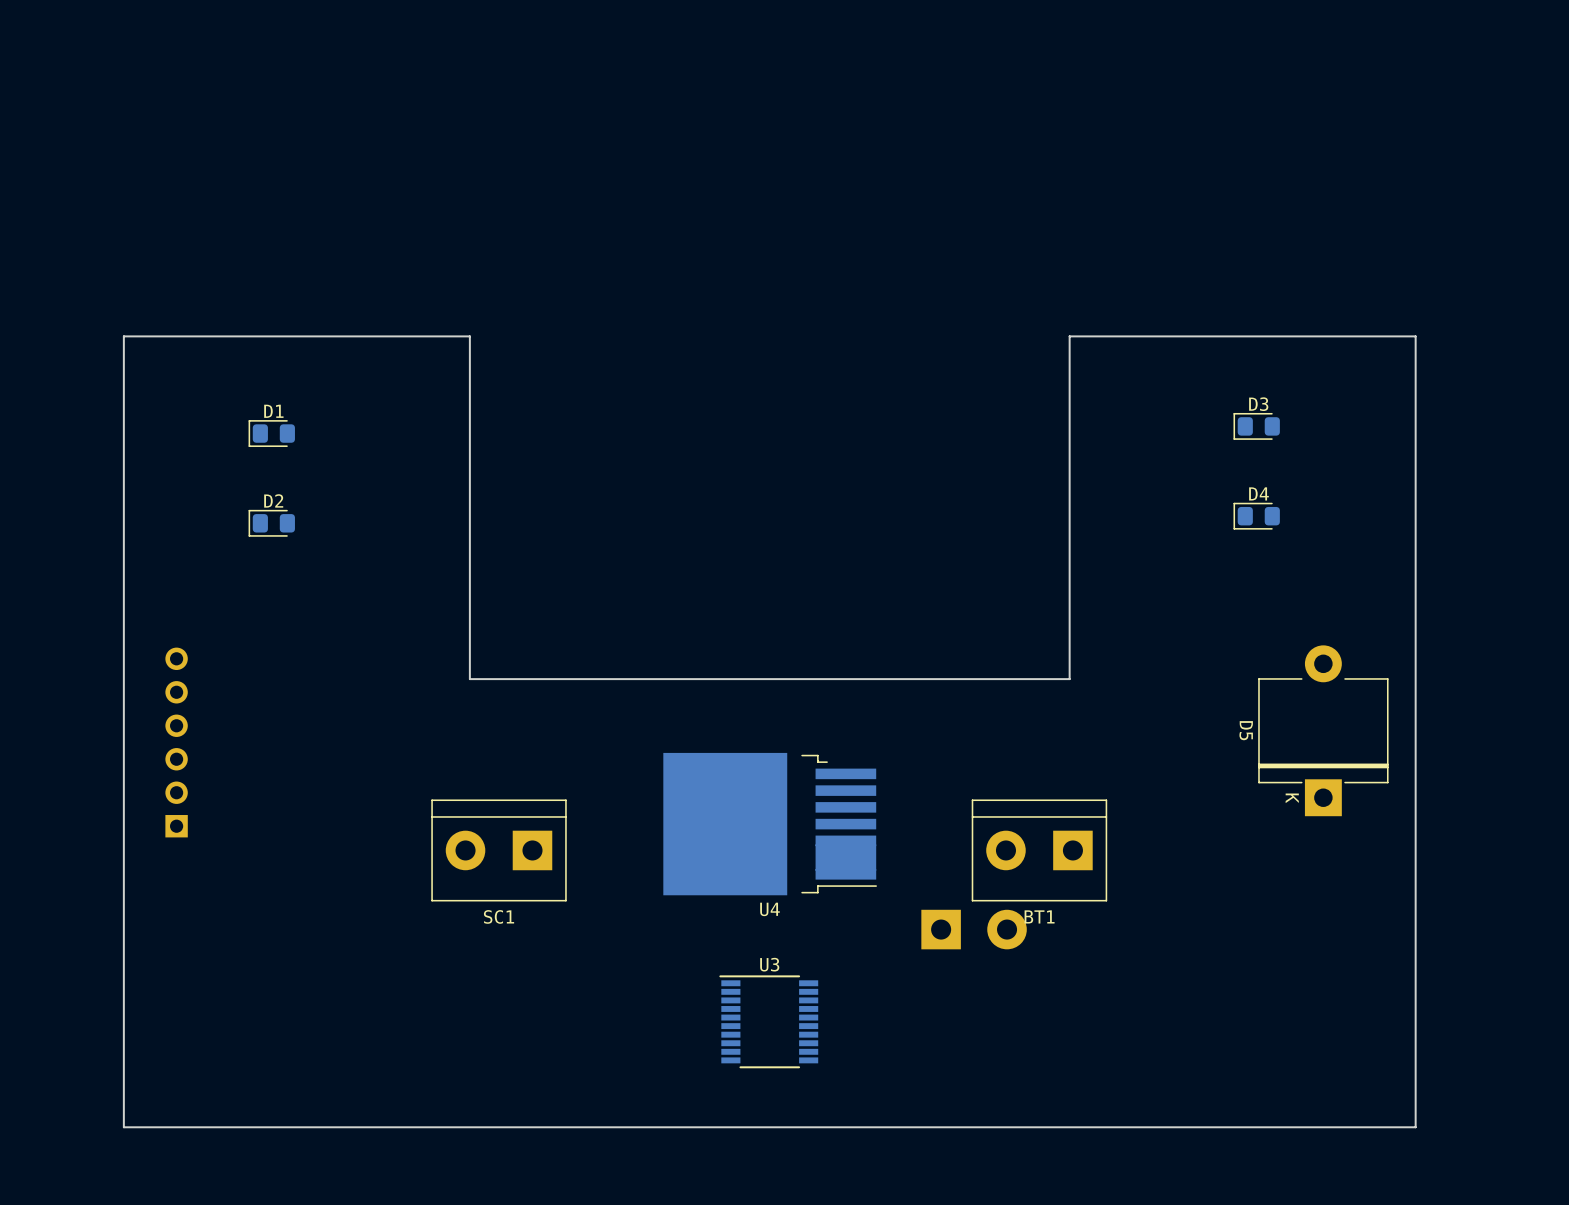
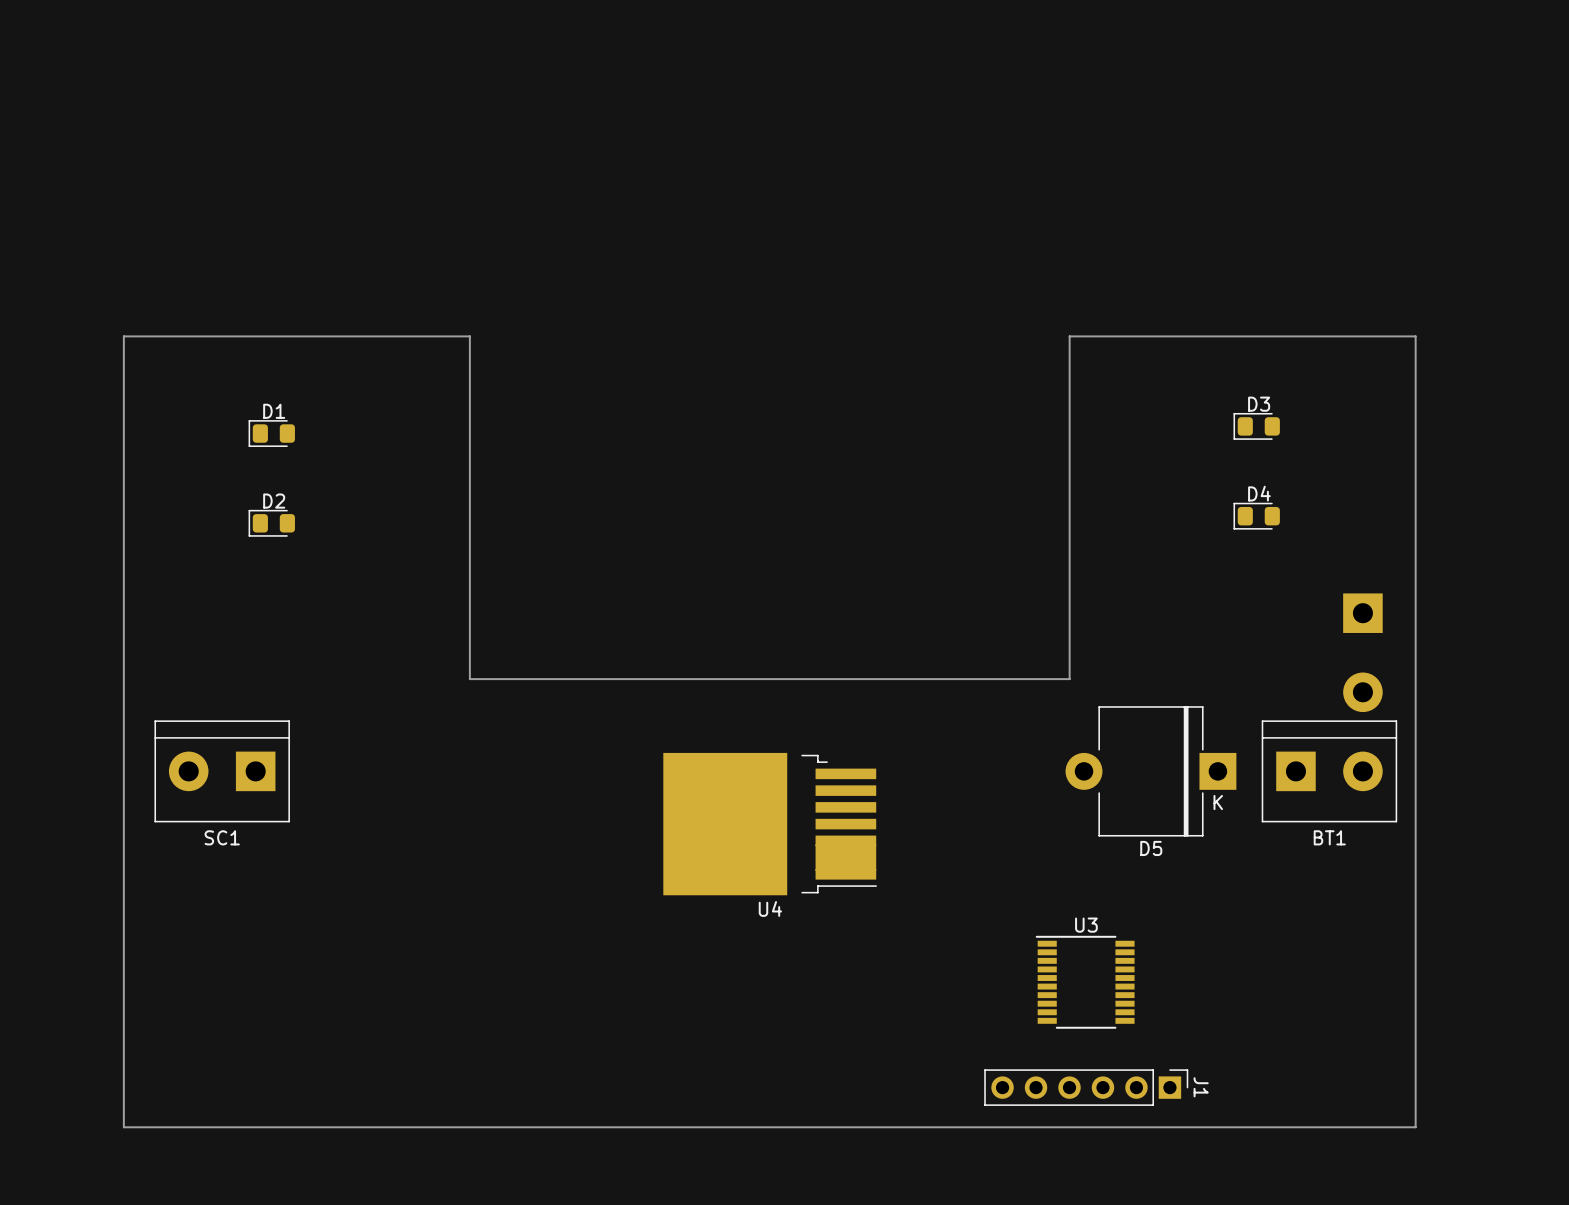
D5 rotation: 0° (1323, 730) -> 90° counterclockwise (1150, 771)
D5 position: (1323, 730) -> (1150, 771)
part: (176, 742) -> none
BT1 footprint: [921, 799, 1108, 950] -> [1261, 593, 1398, 823]
SC1 position: (499, 850) -> (222, 771)
BT1 name position: BT1 (1039, 916) -> BT1 (1329, 837)
U3 position: (768, 1021) -> (1085, 982)
J1: none -> (1086, 1087)

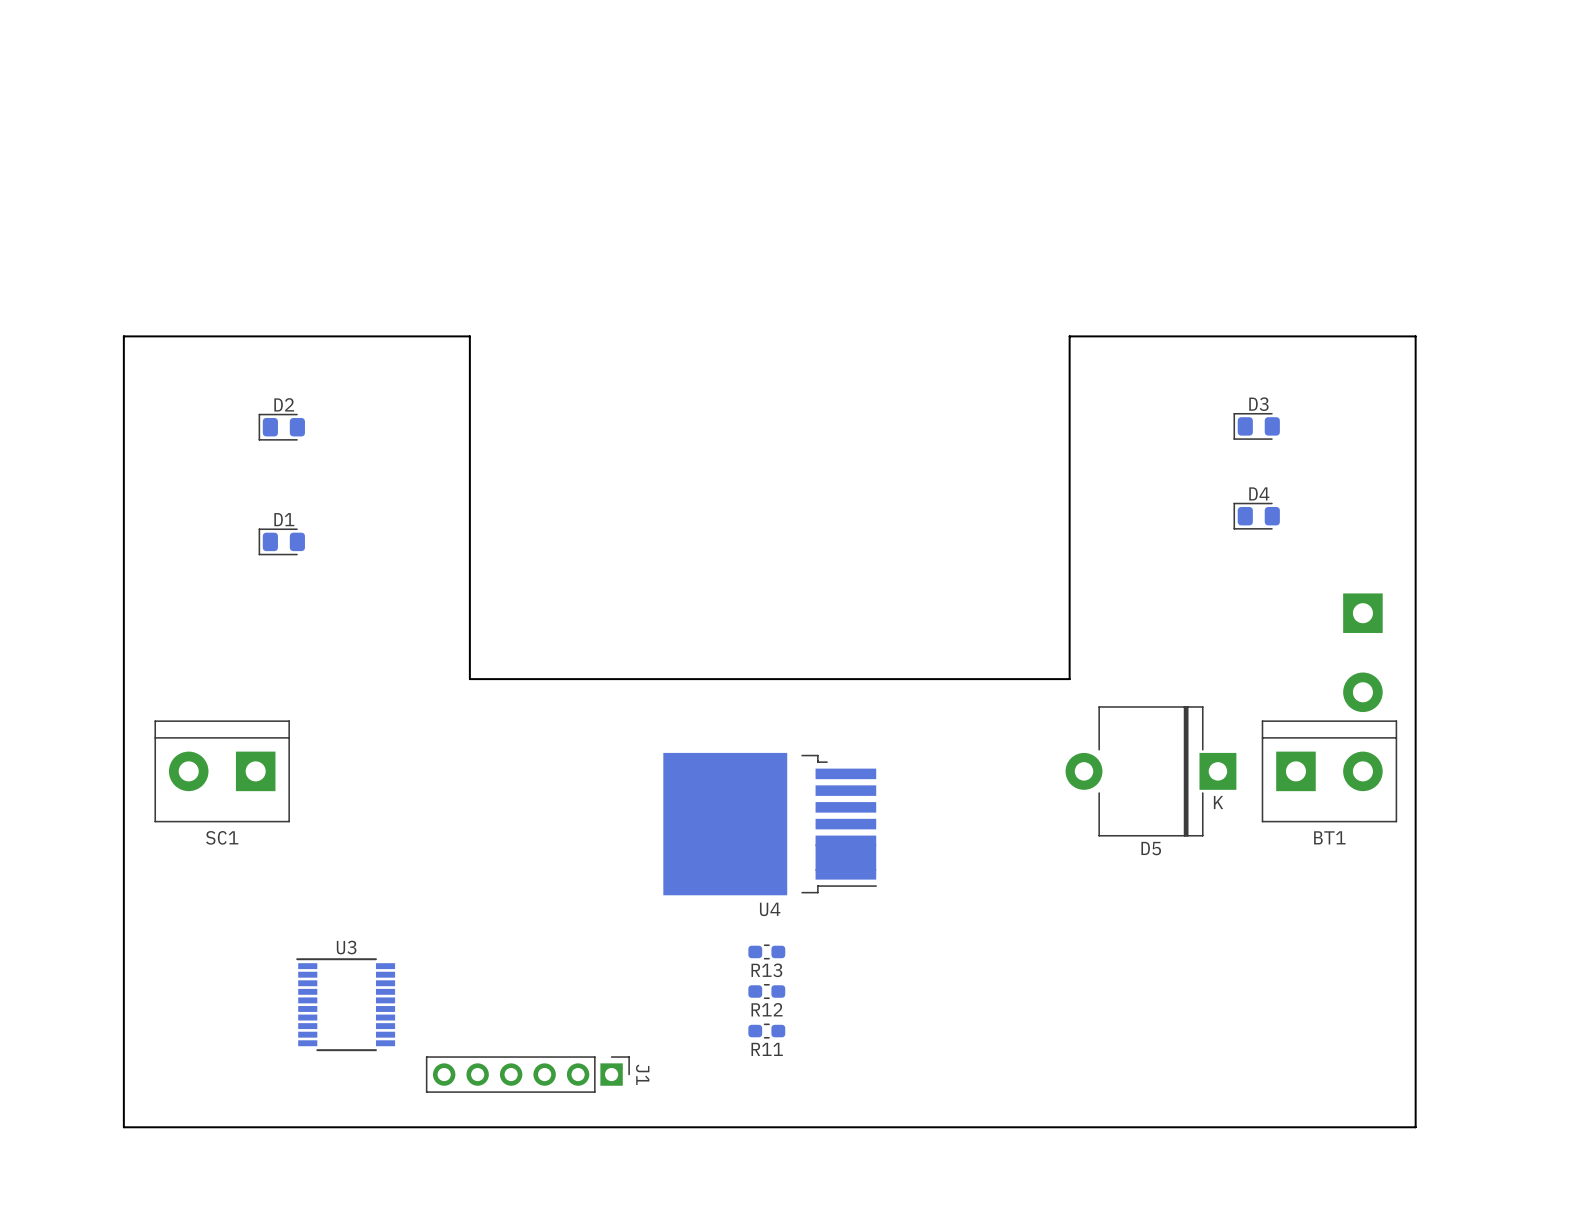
D1 position: (271, 433) -> (281, 541)
D2 position: (271, 523) -> (281, 427)
R13: none -> (766, 951)
U3 position: (1085, 982) -> (345, 1004)
R12: none -> (766, 991)
R11: none -> (766, 1031)
J1 position: (1086, 1087) -> (527, 1074)

